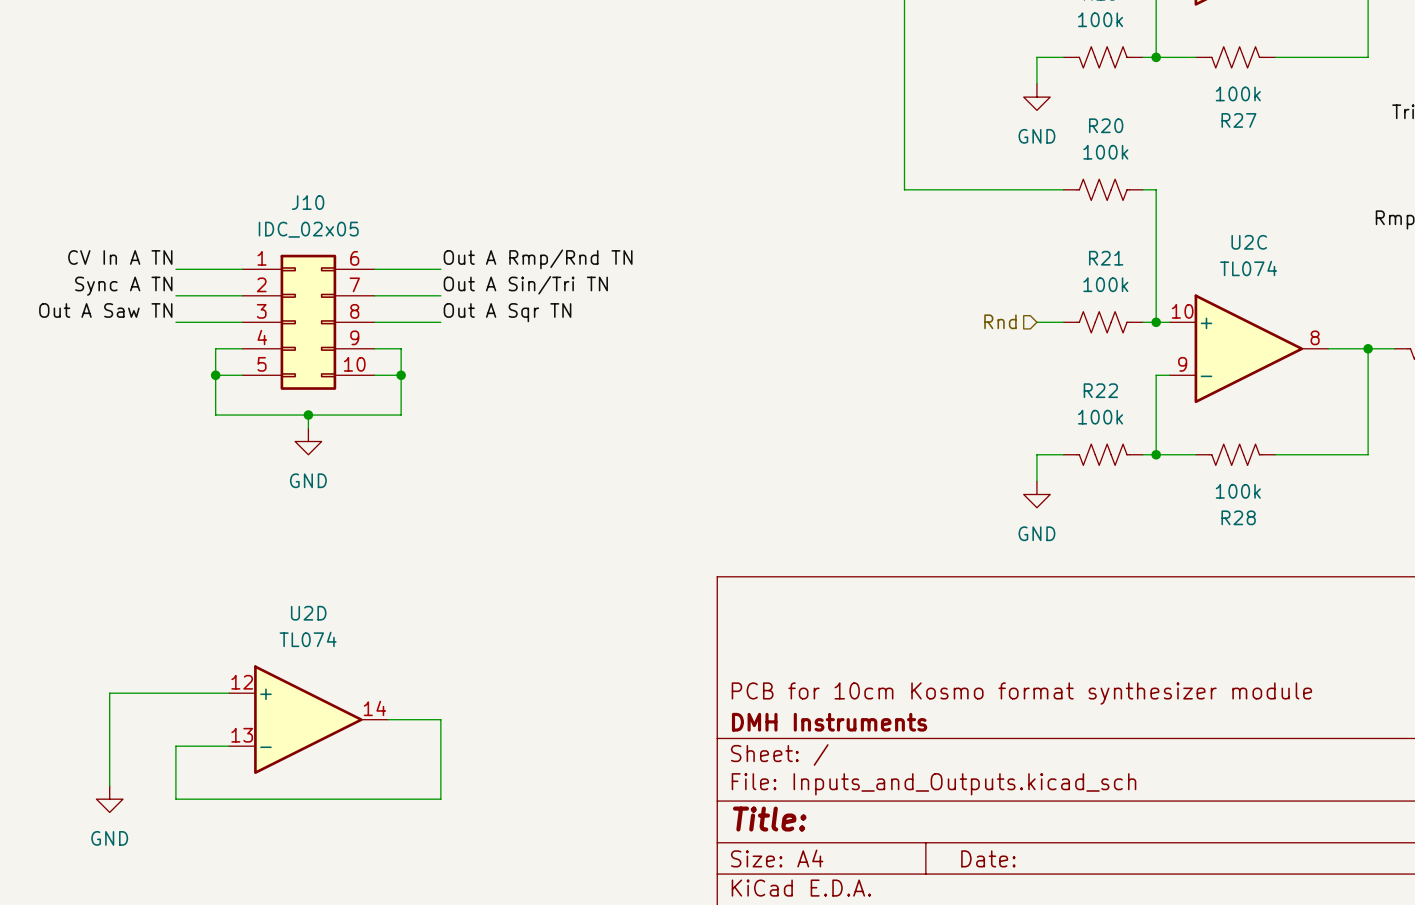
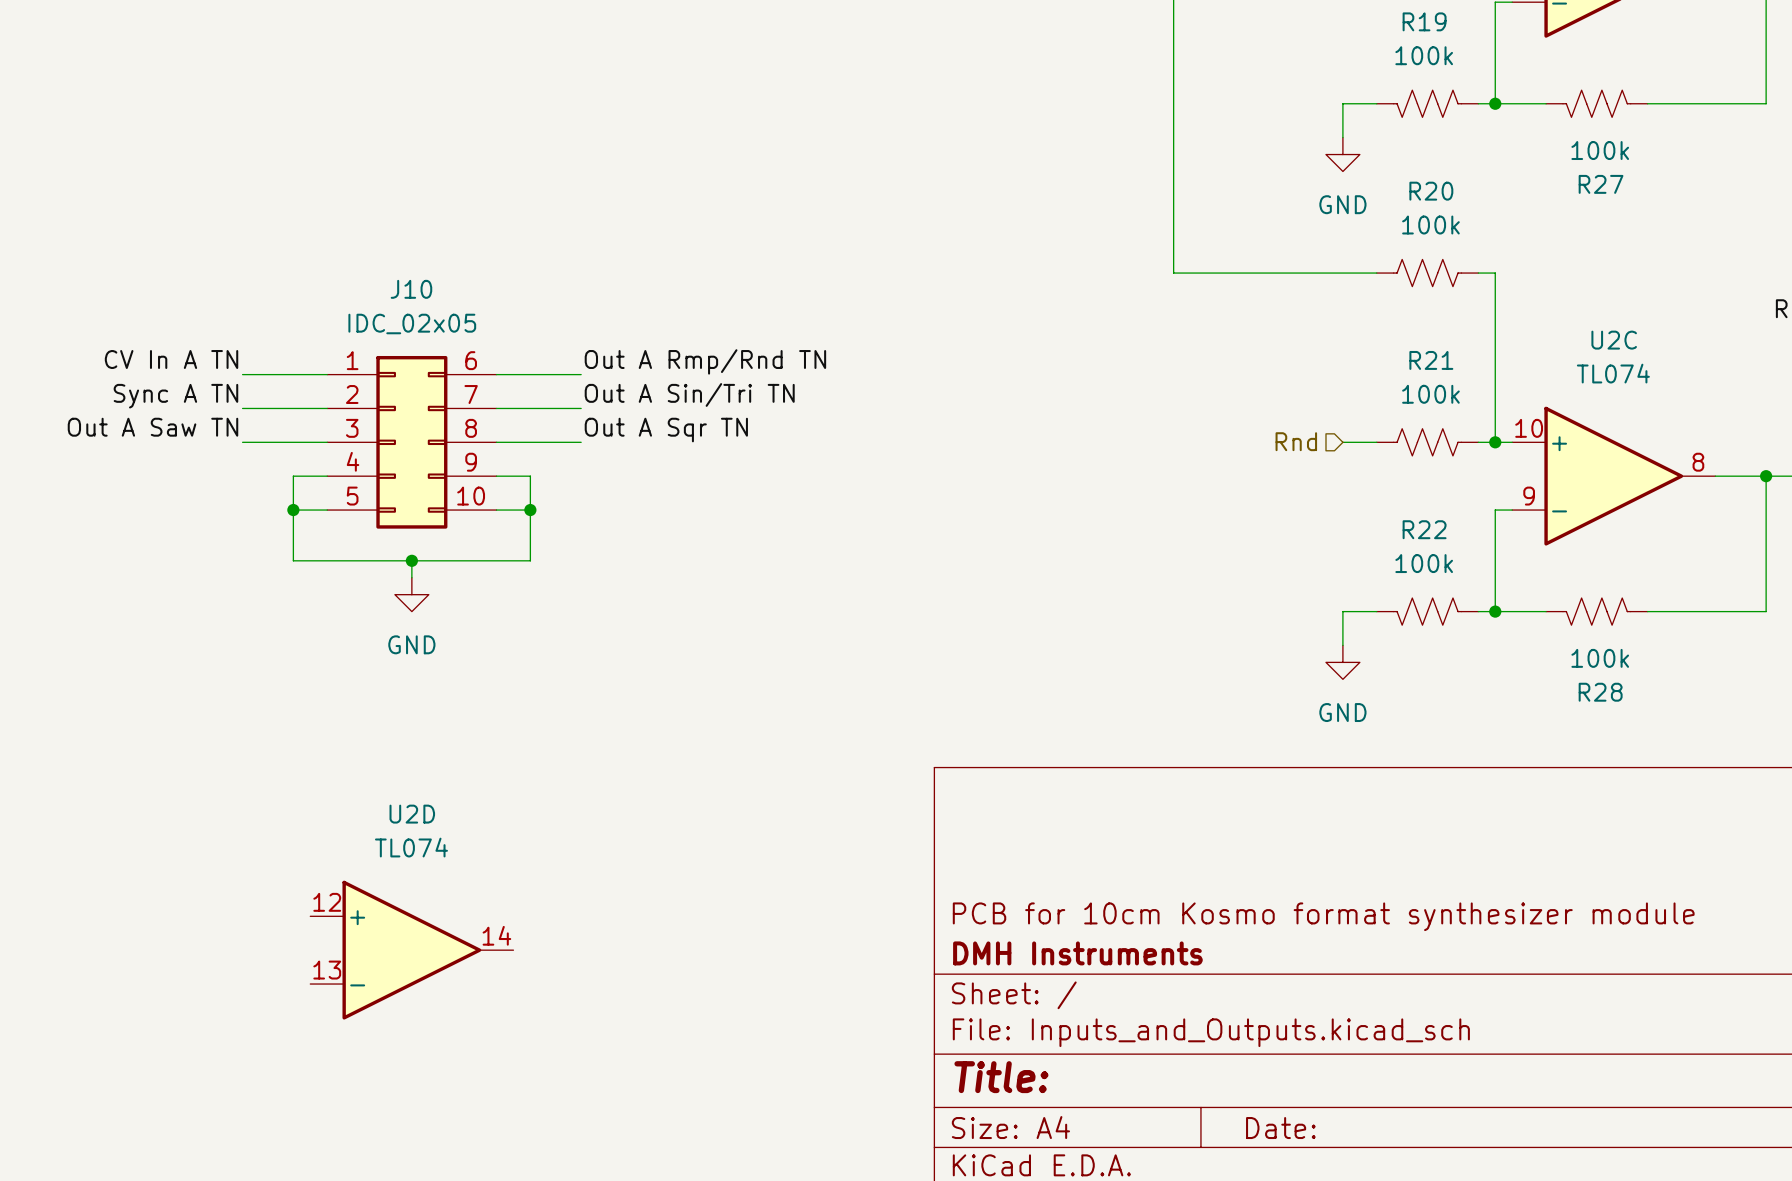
wire: (228, 693) (109, 693) (109, 785) -> none
wire: (387, 719) (440, 719) (440, 799) (175, 799) (175, 746) (228, 746) -> none
power symbol: GND (109, 799) -> none

